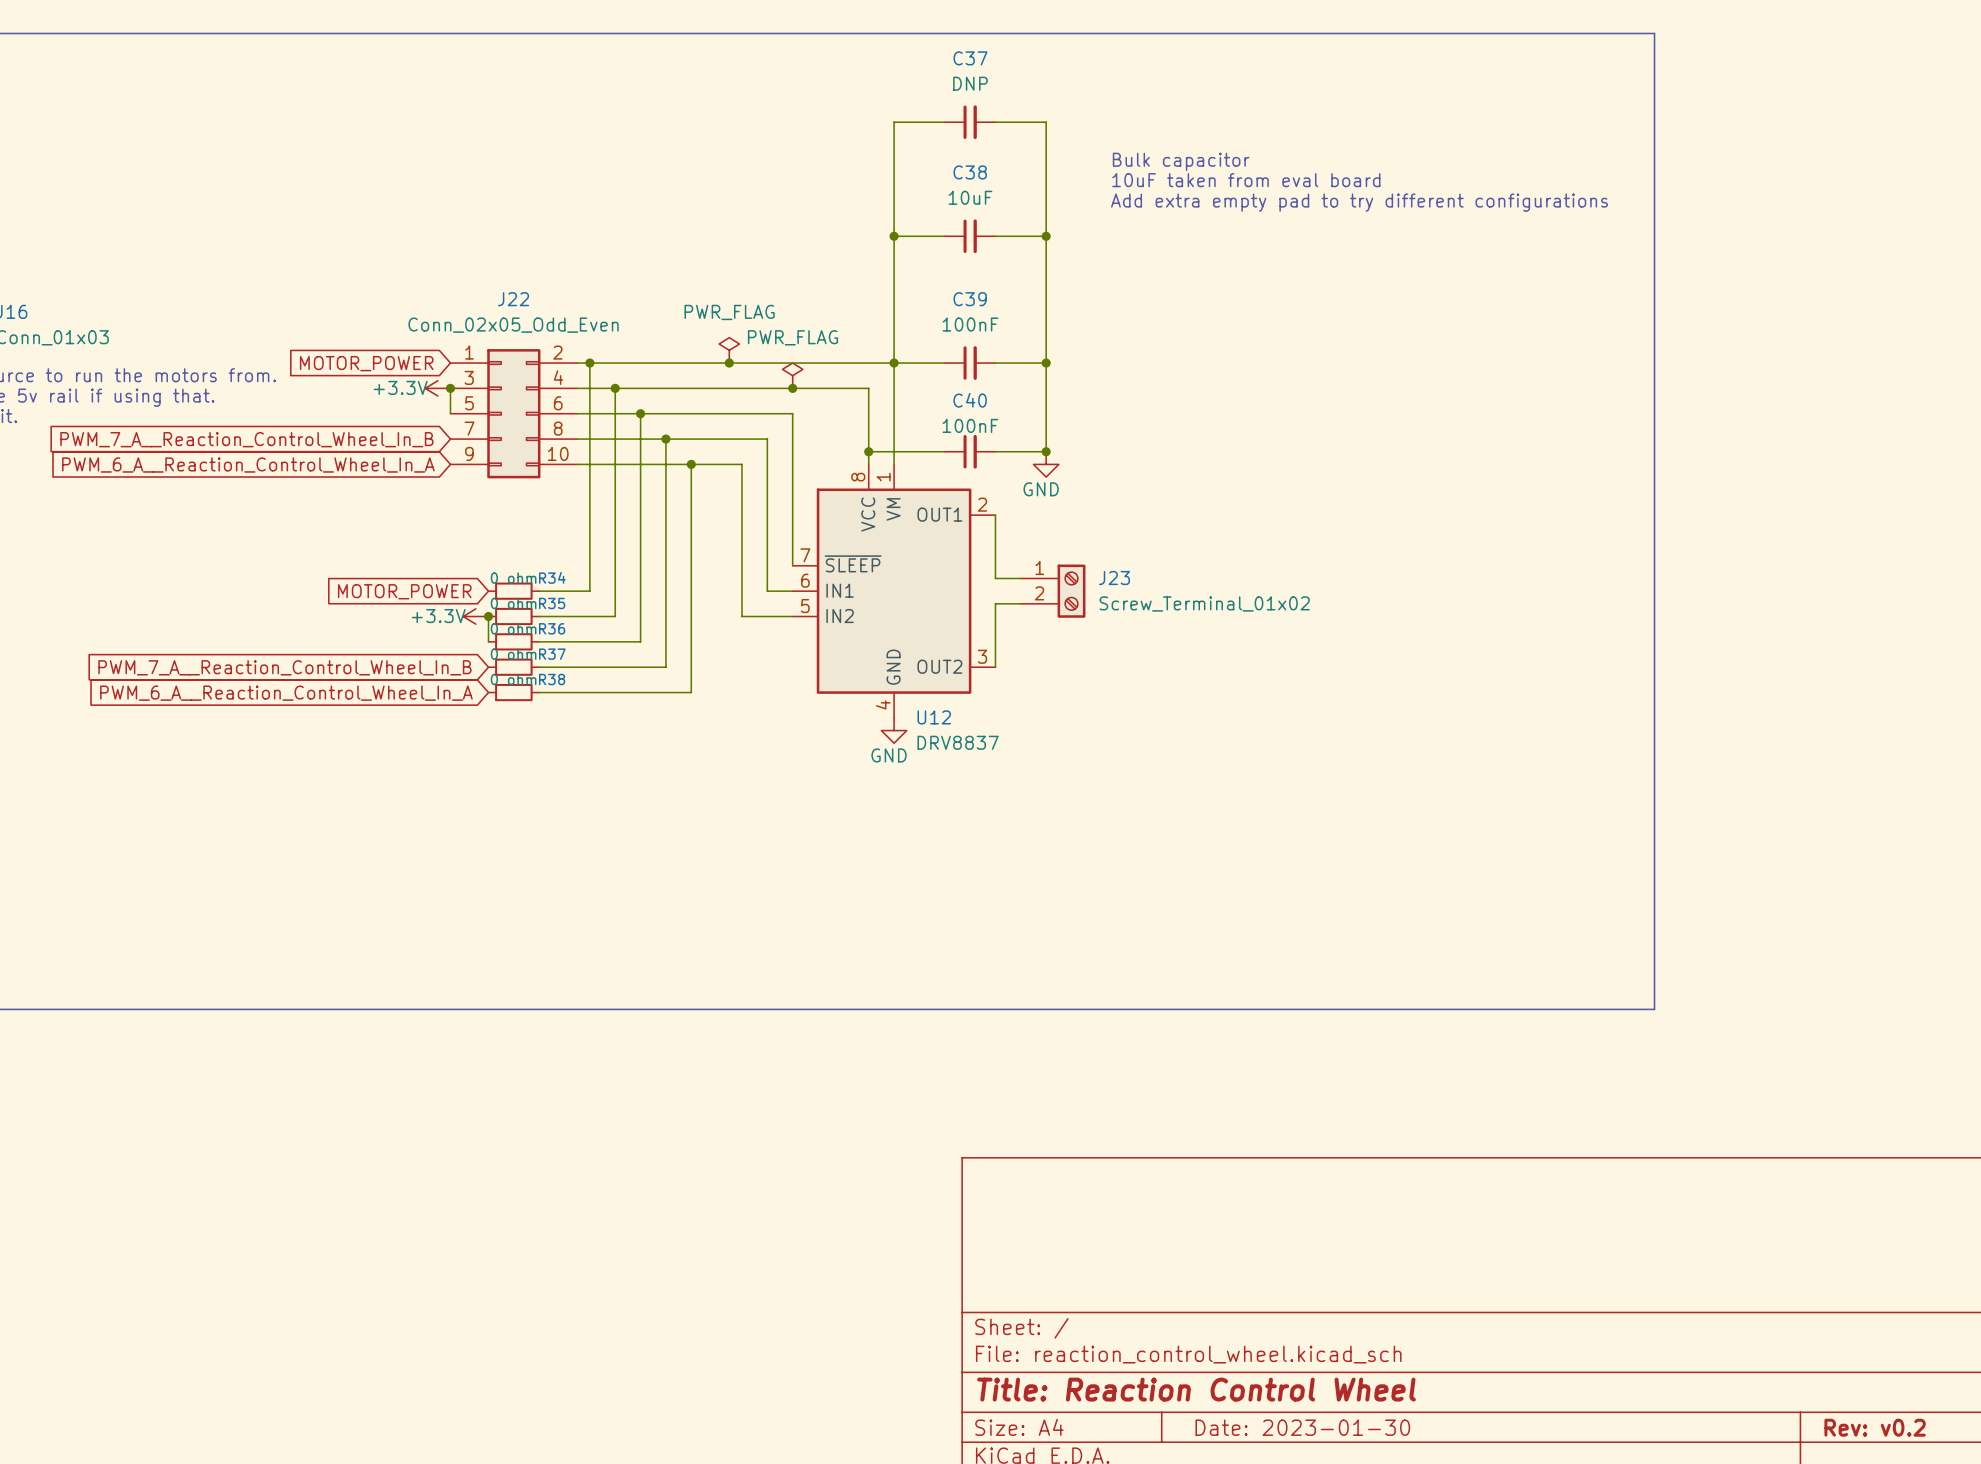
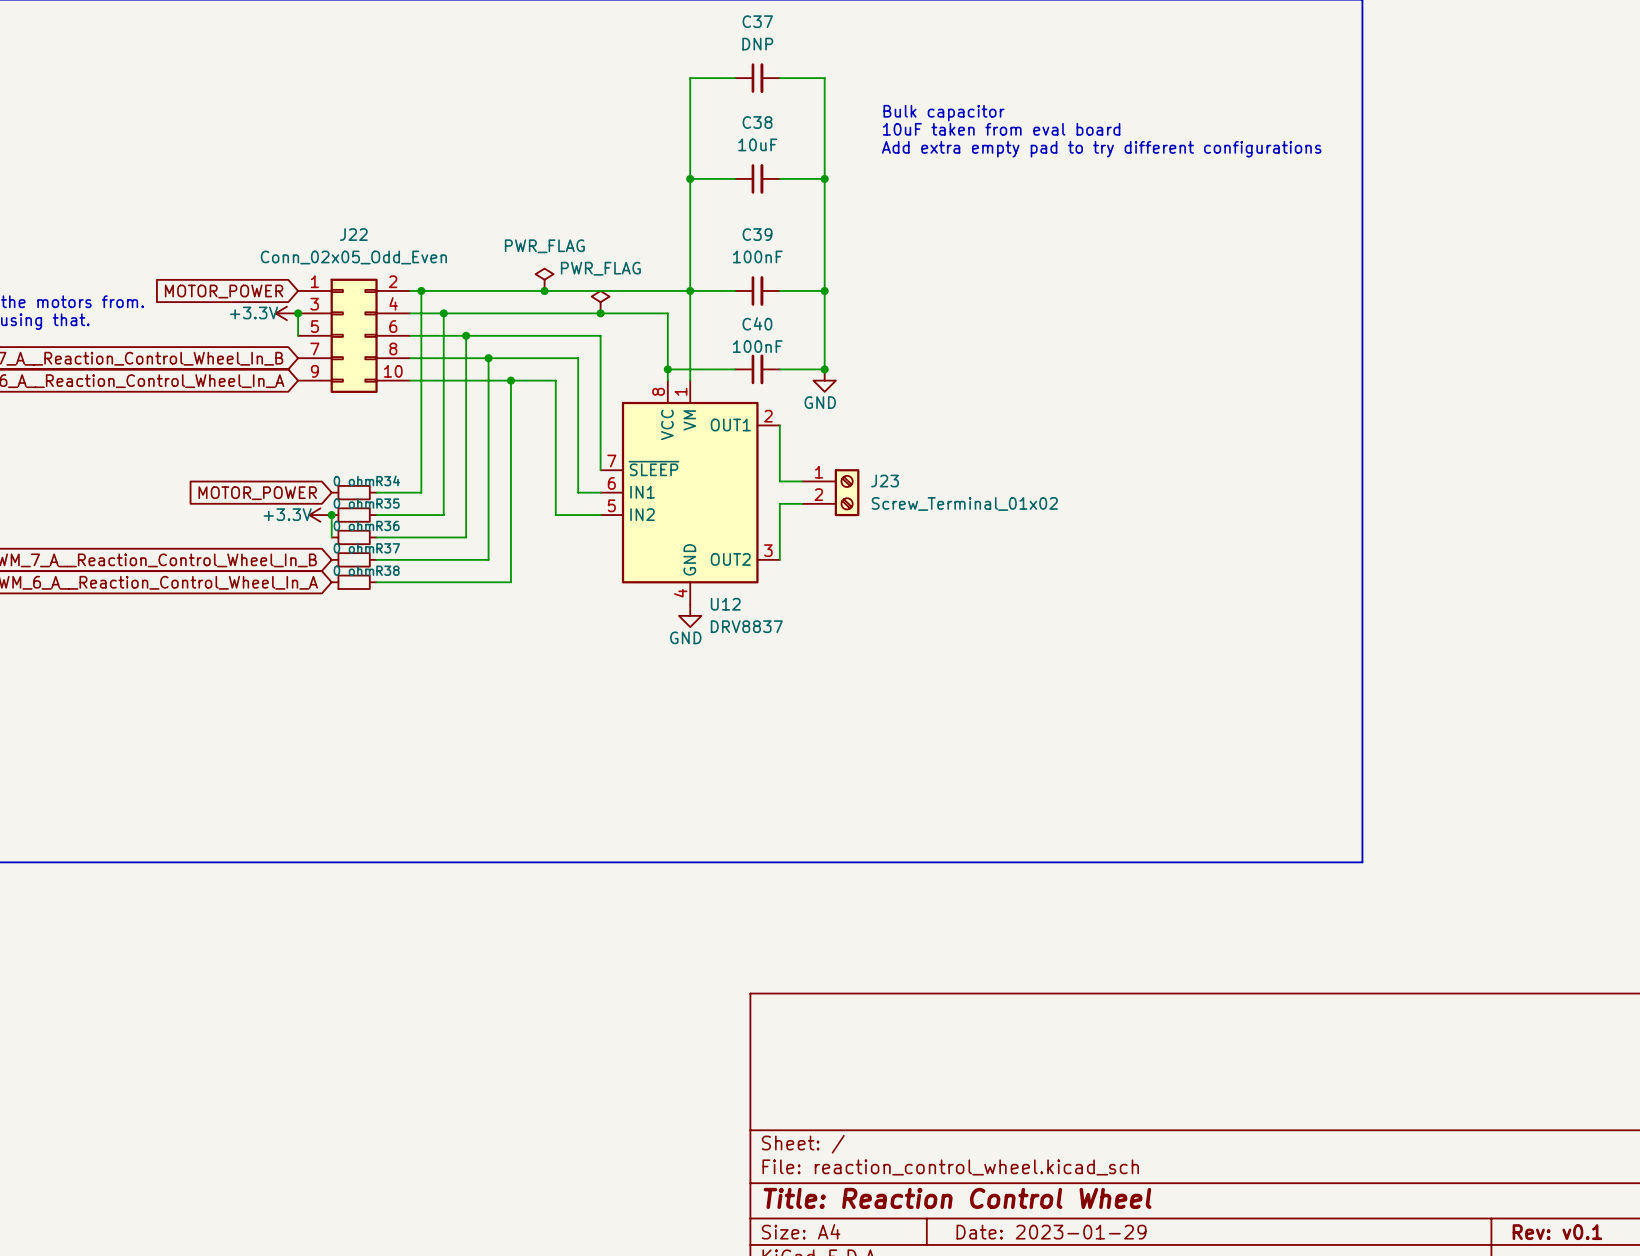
title block: Date: 2023-01-30 (1302, 1427) -> Date: 2023-01-29 (1051, 1232)
title block: Rev: v0.2 (1875, 1427) -> Rev: v0.1 (1557, 1232)

